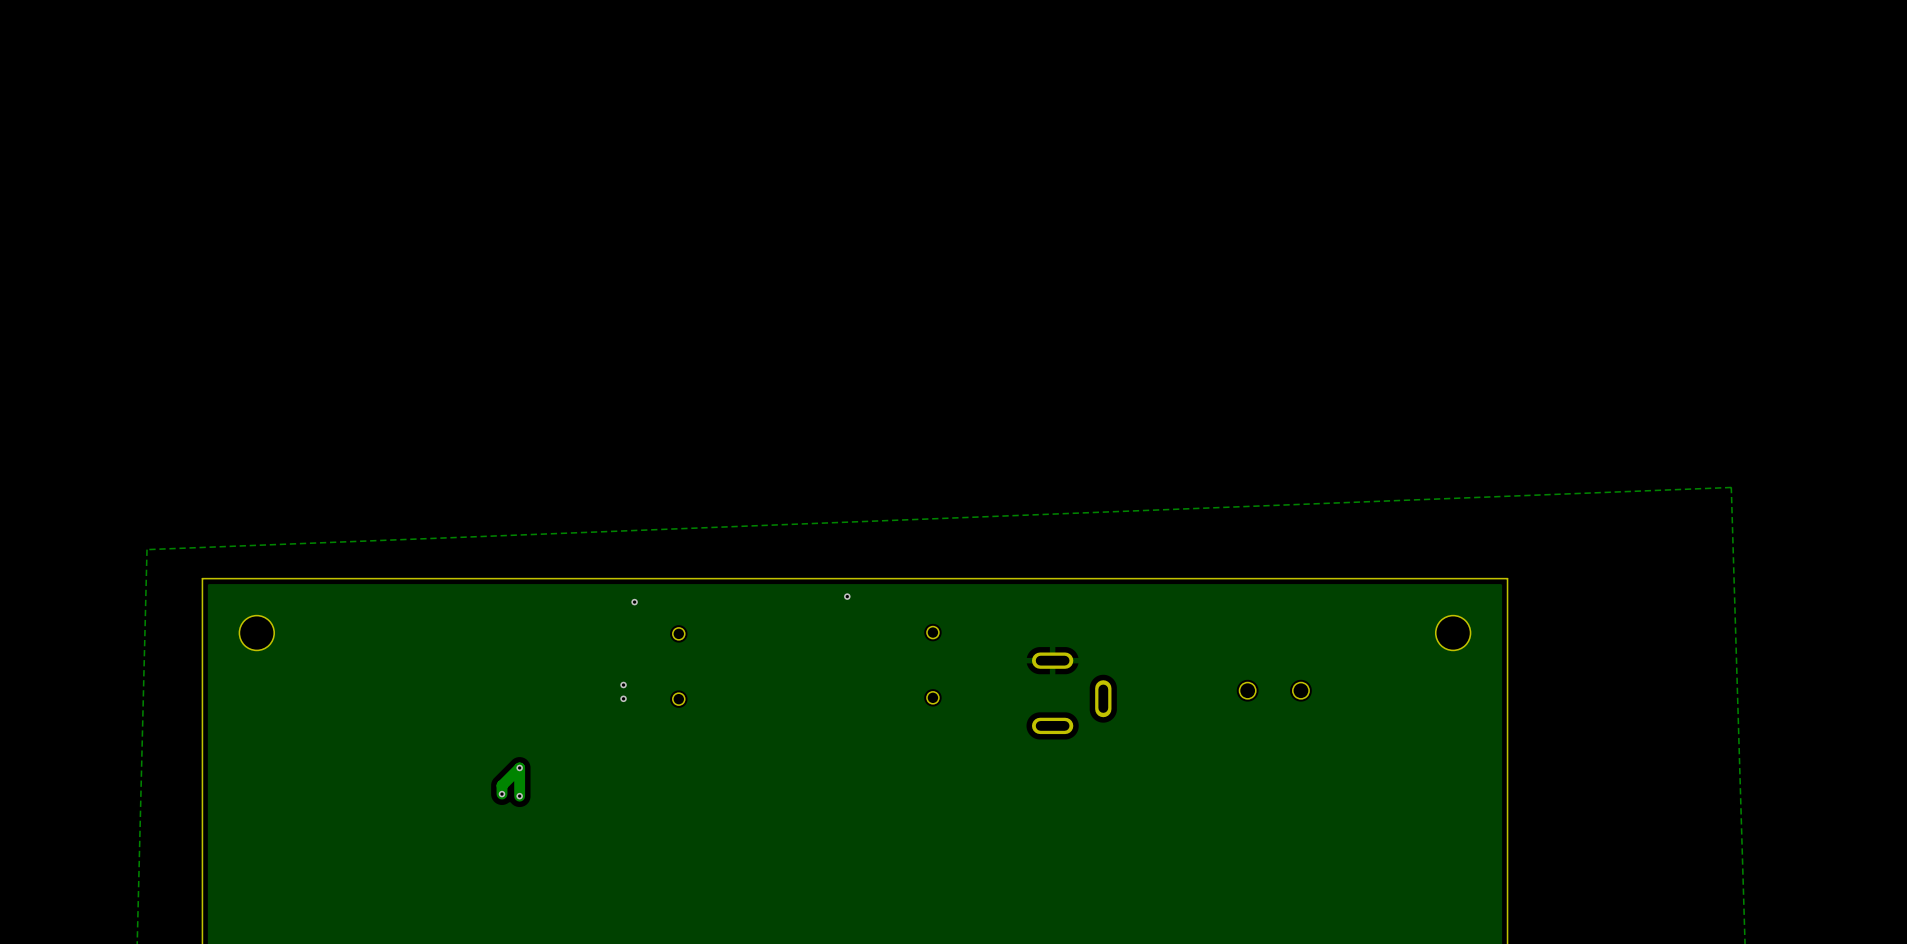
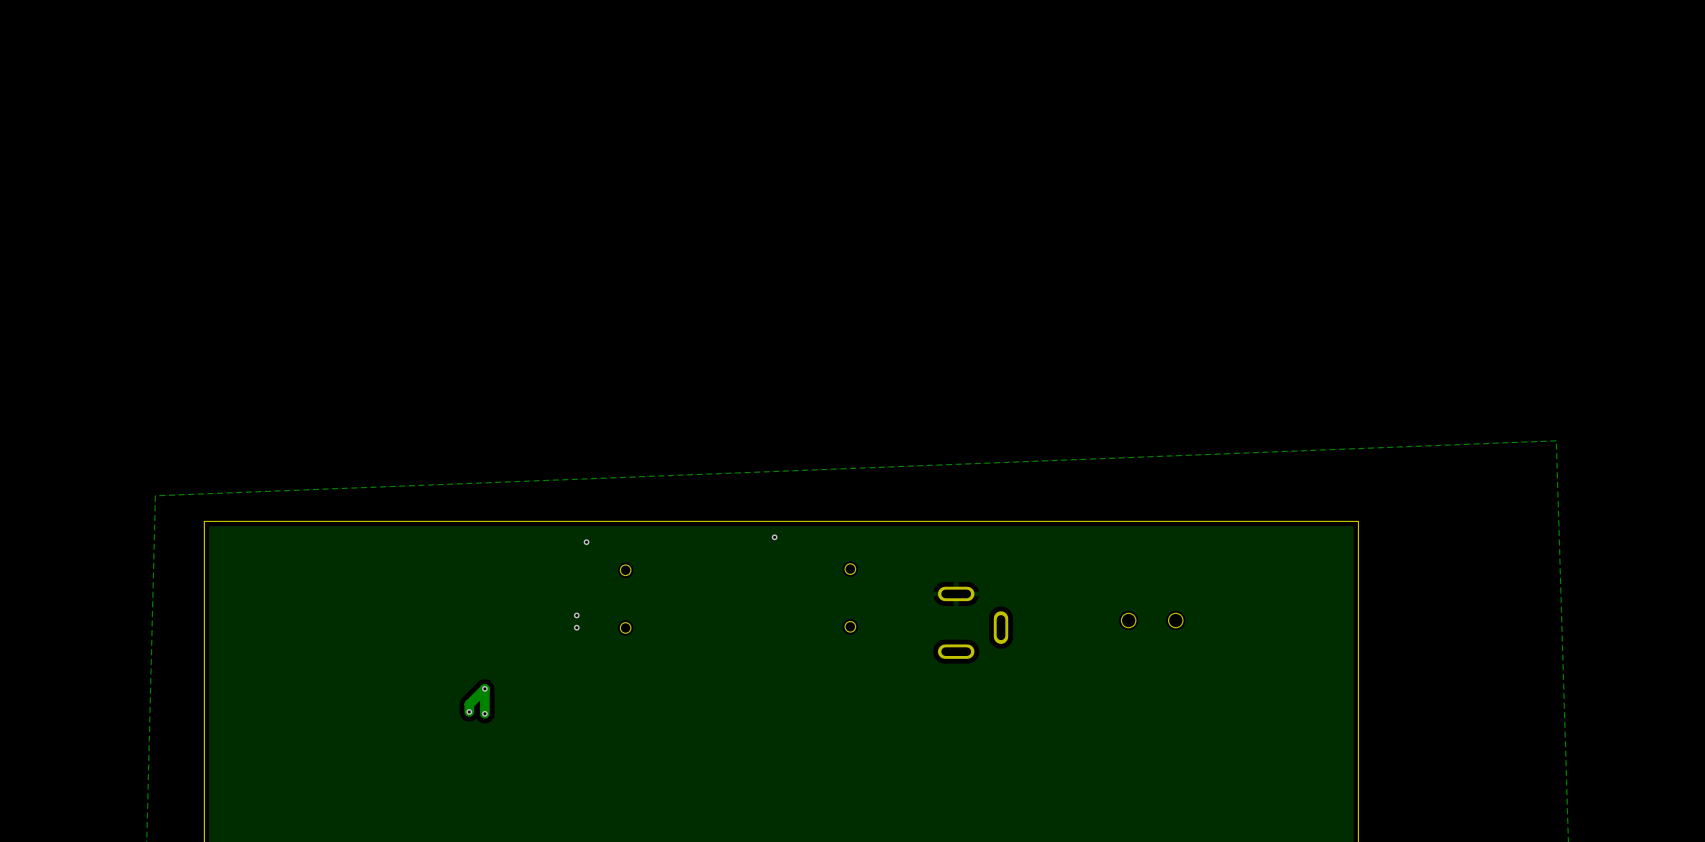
part: (256, 633) -> none
part: (1453, 633) -> none

